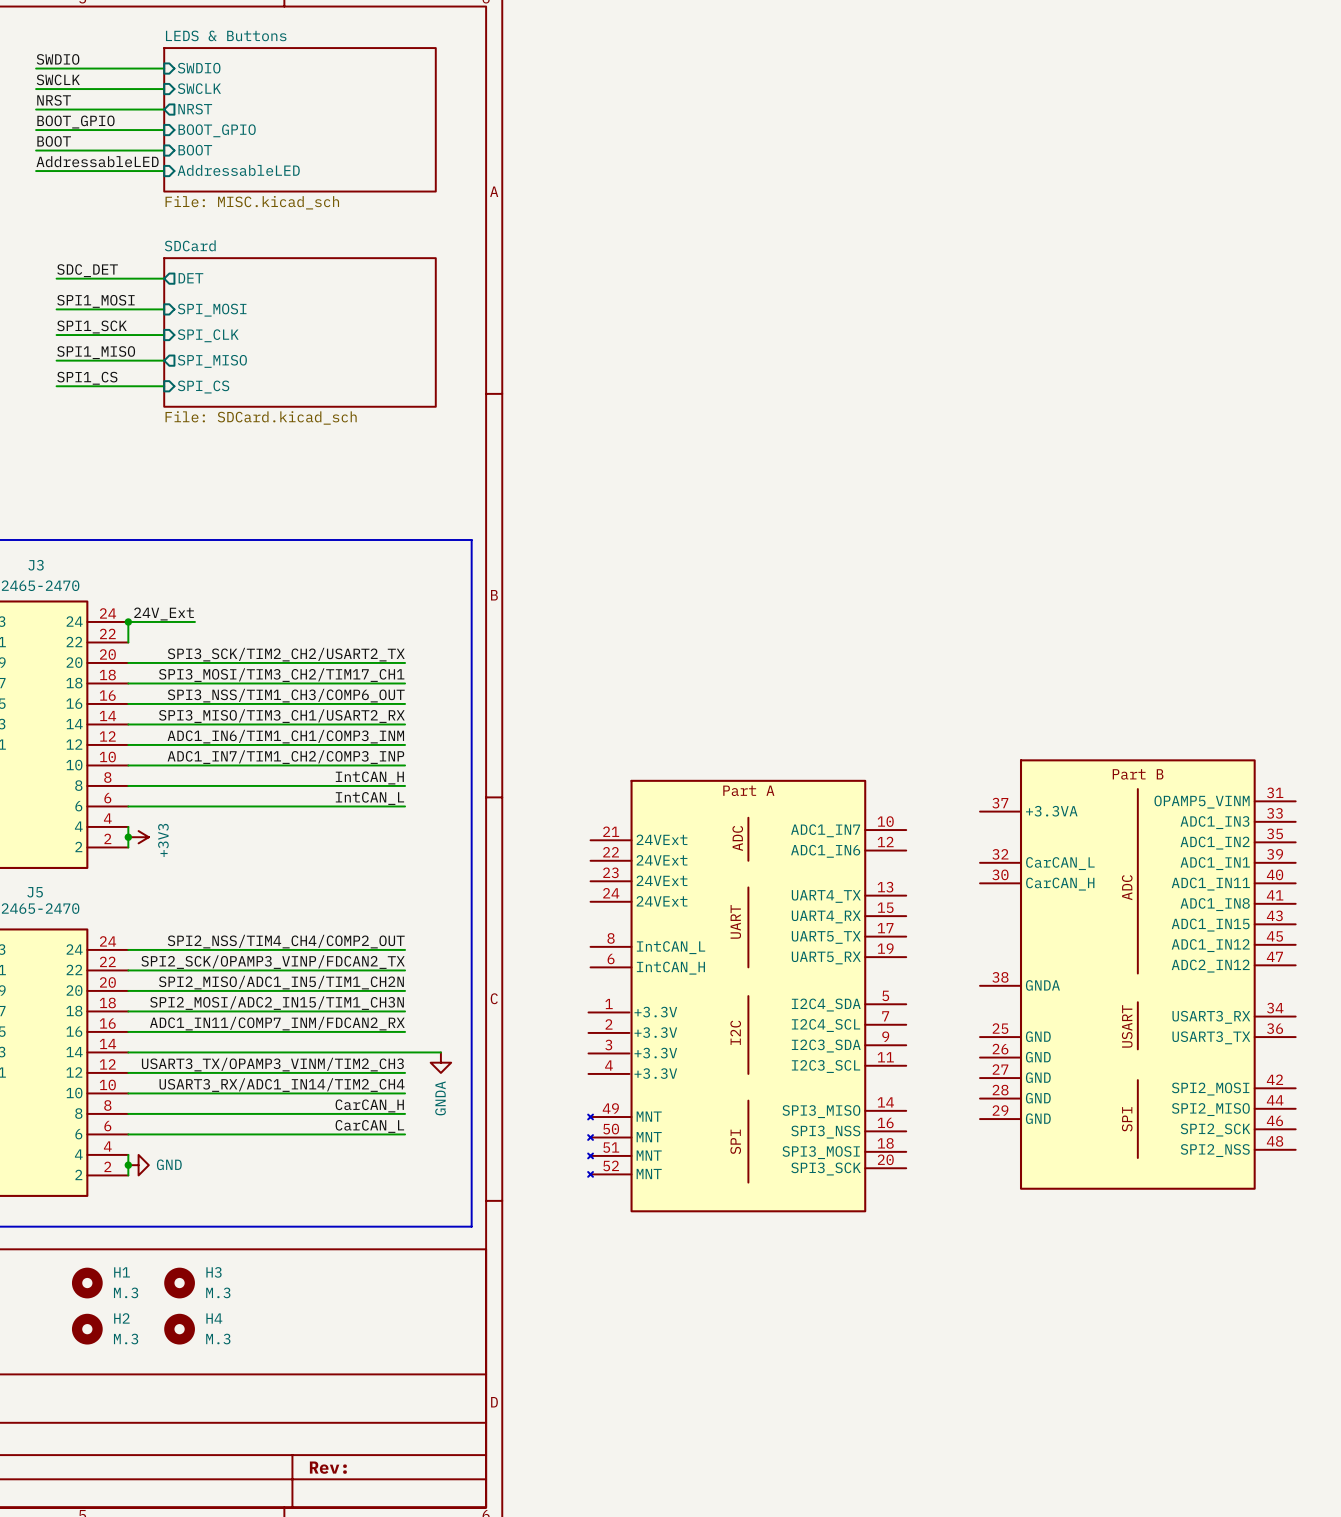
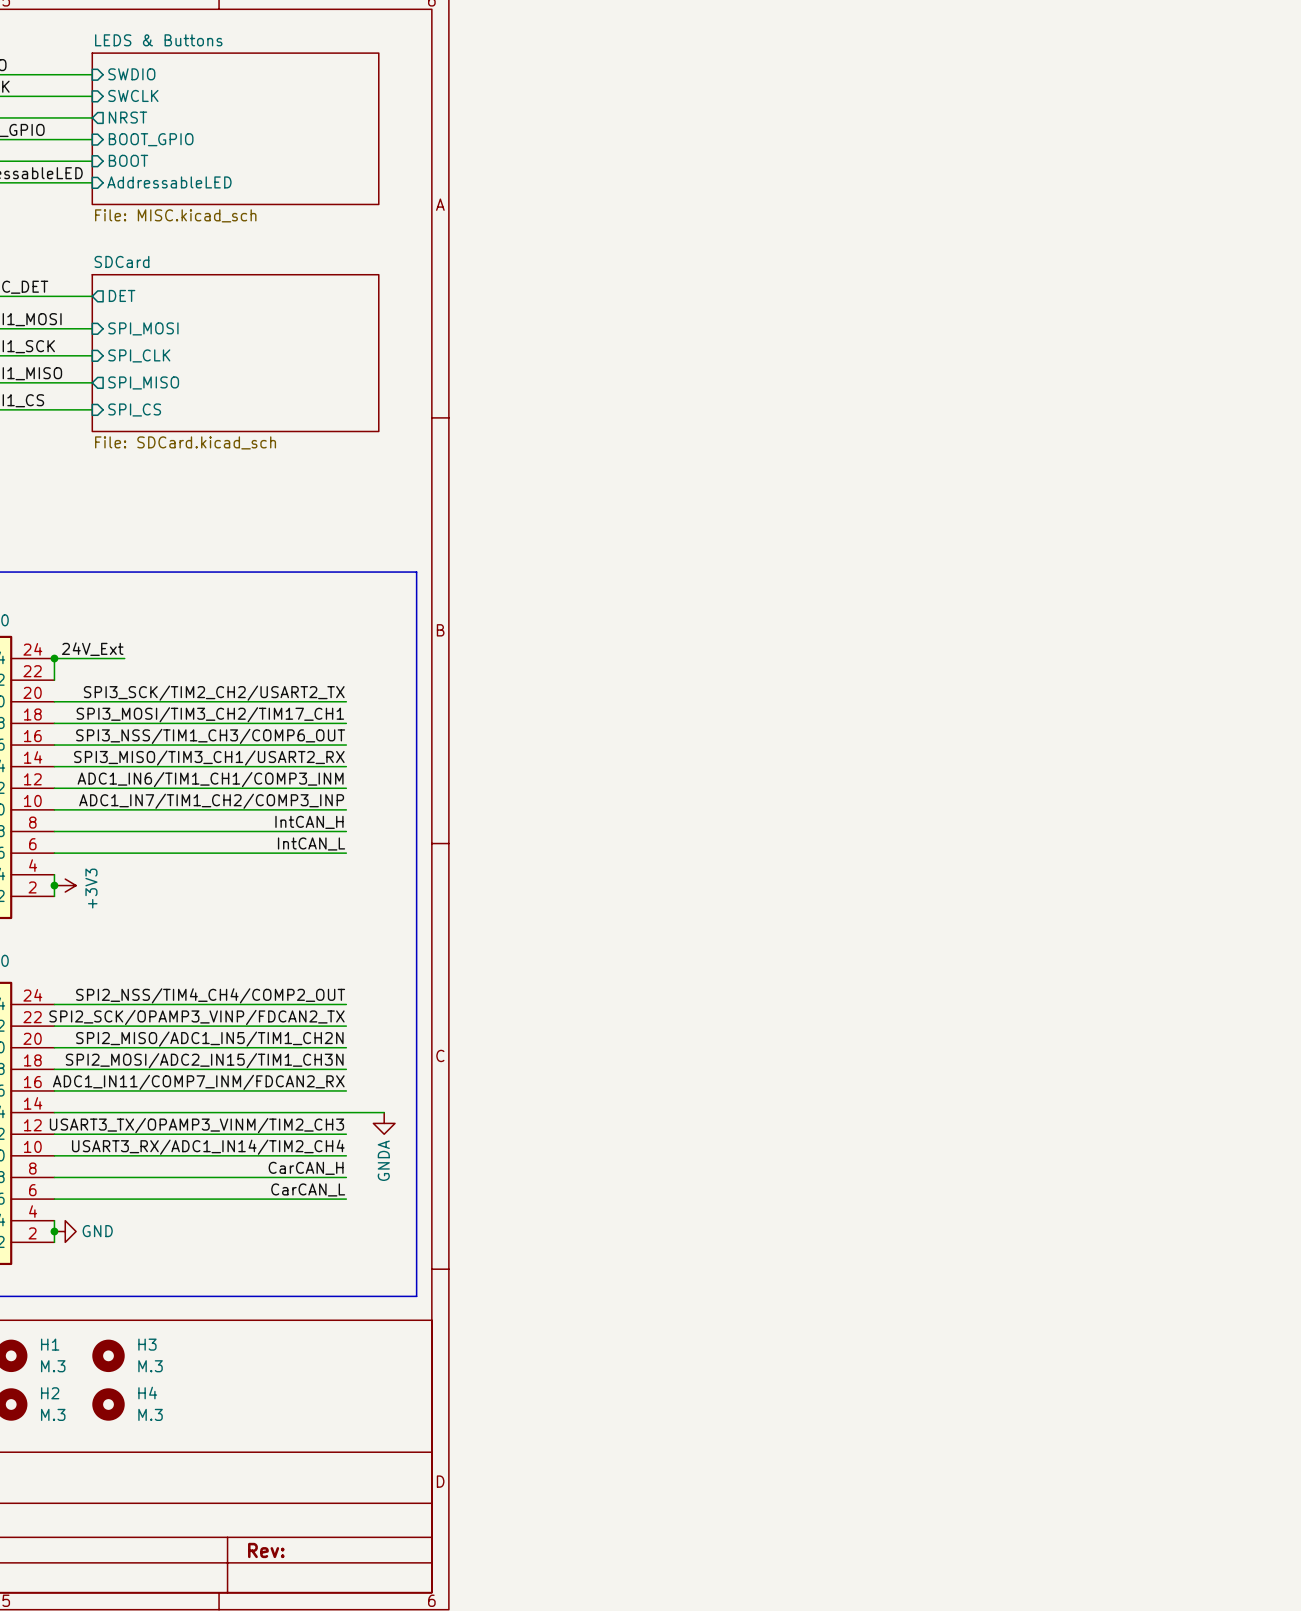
part: (1137, 974) -> none
part: (747, 996) -> none

